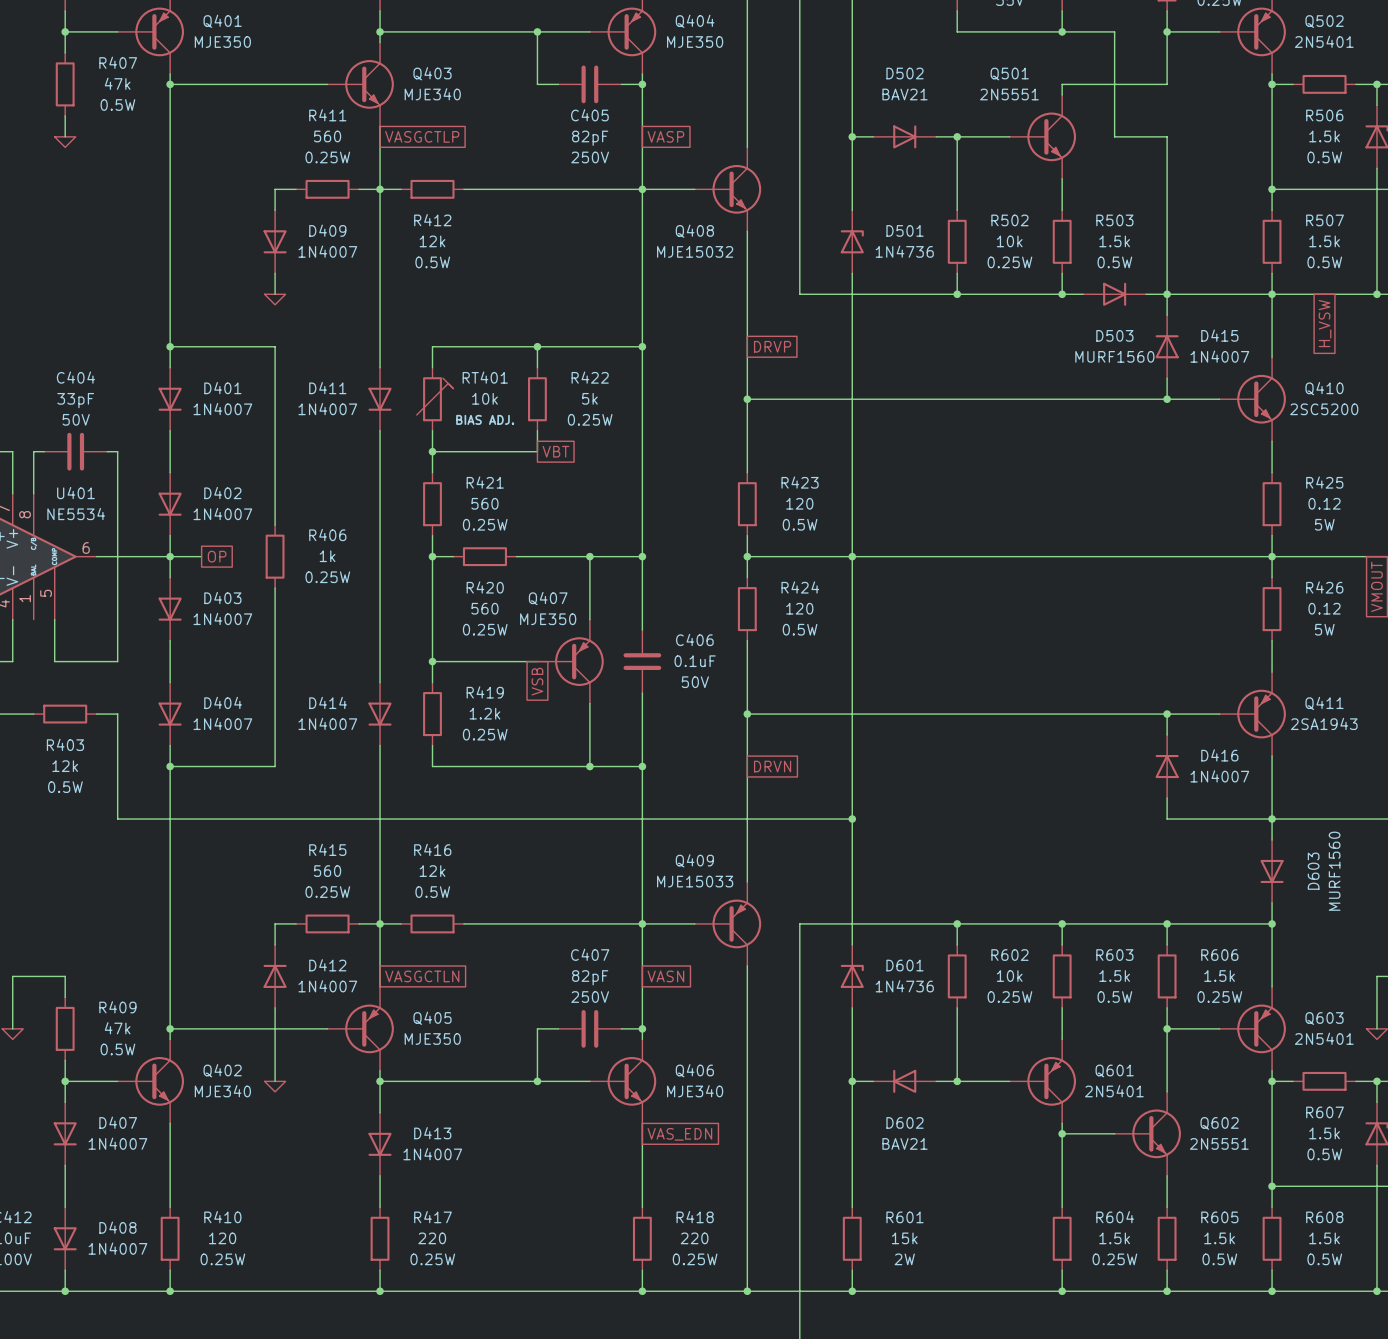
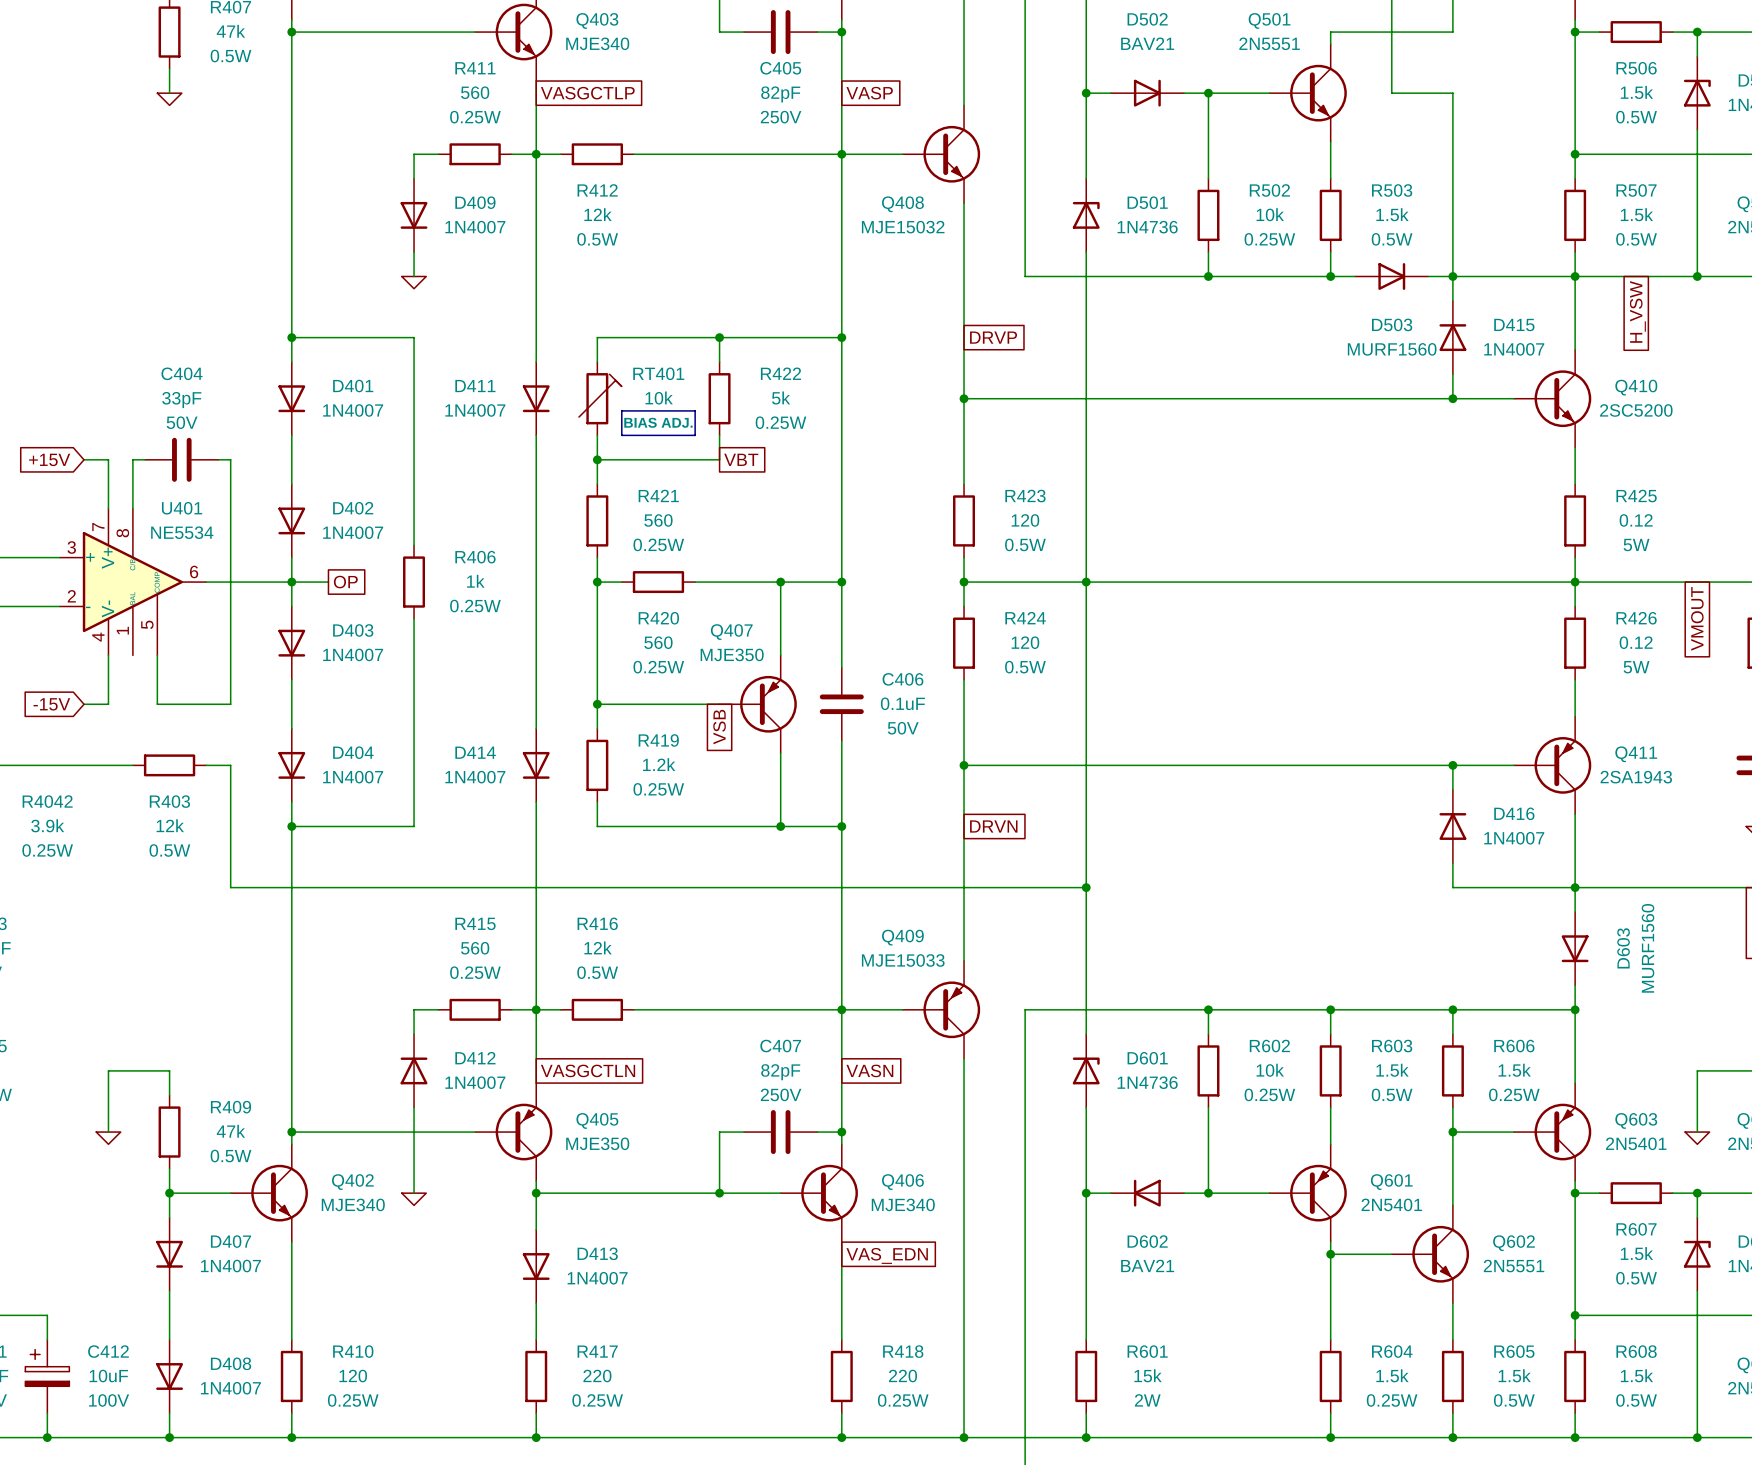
line: none -> (621, 410) (695, 410) (695, 435) (621, 435) (621, 410)

